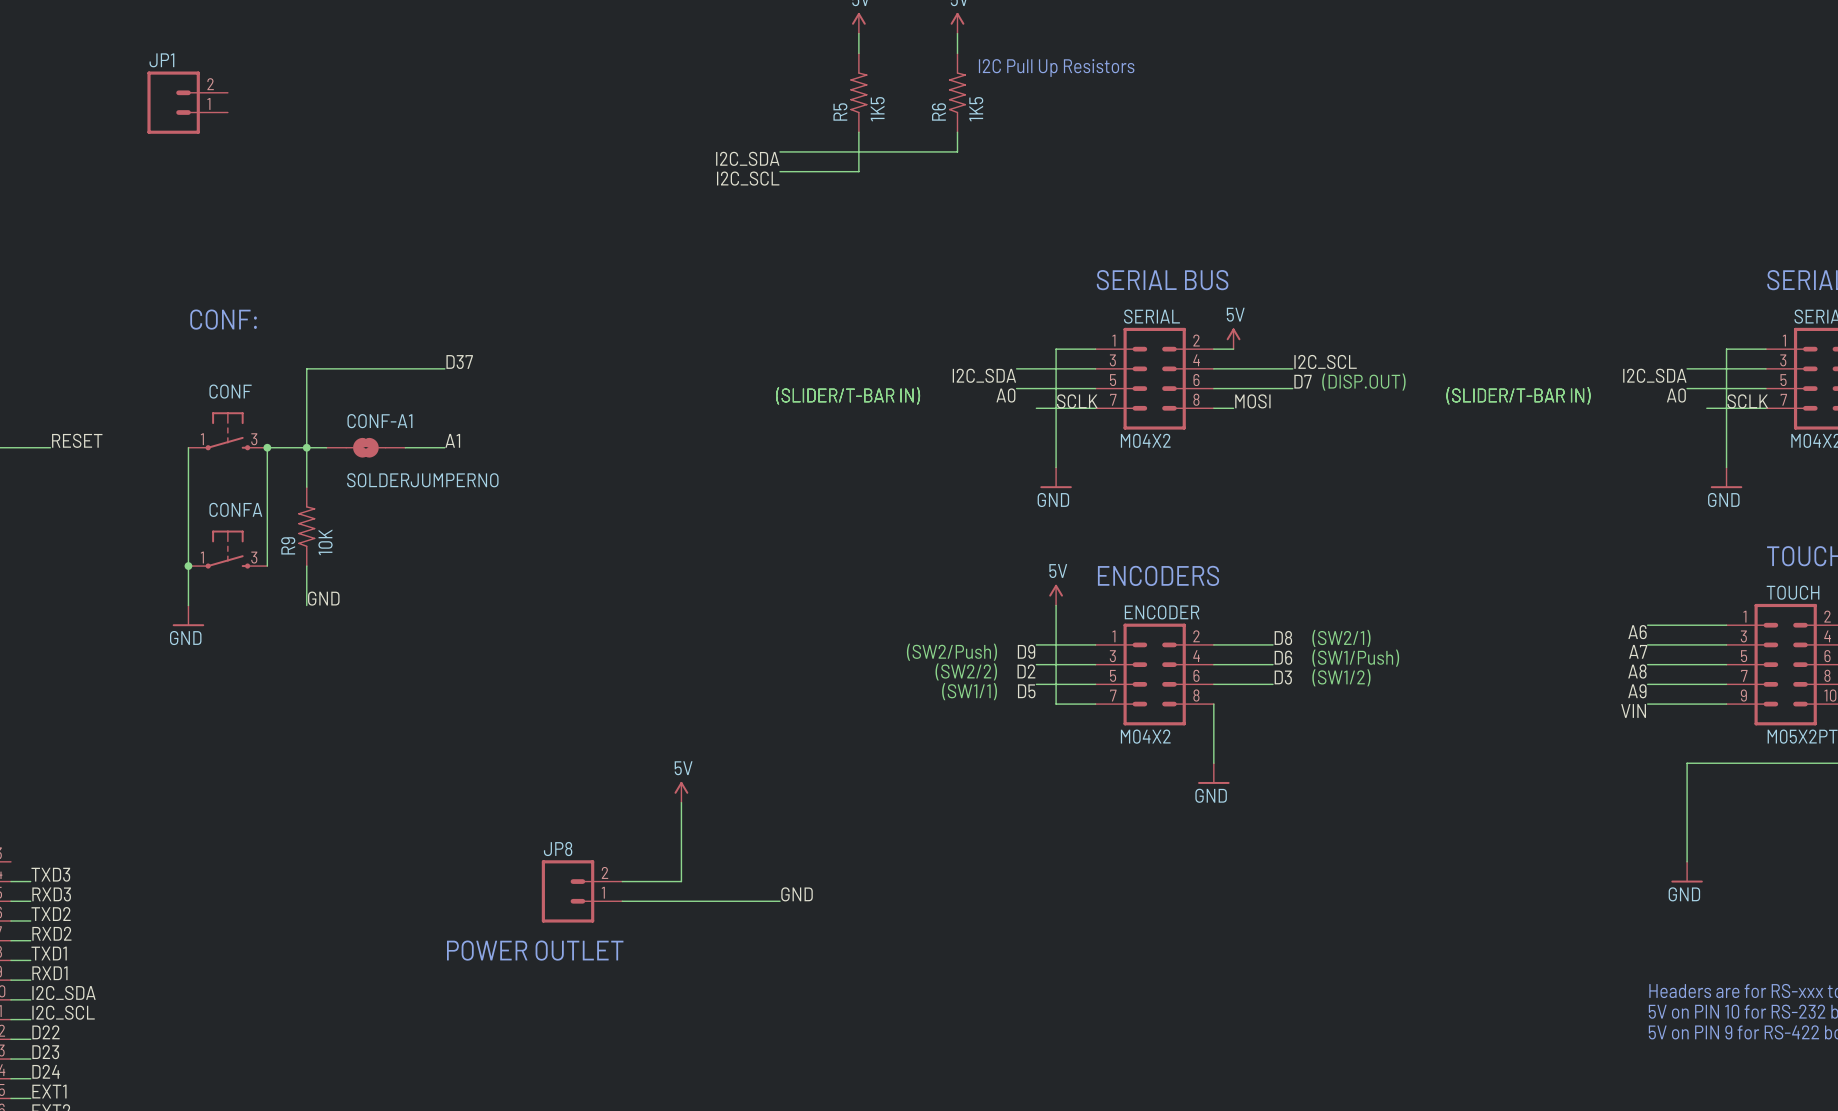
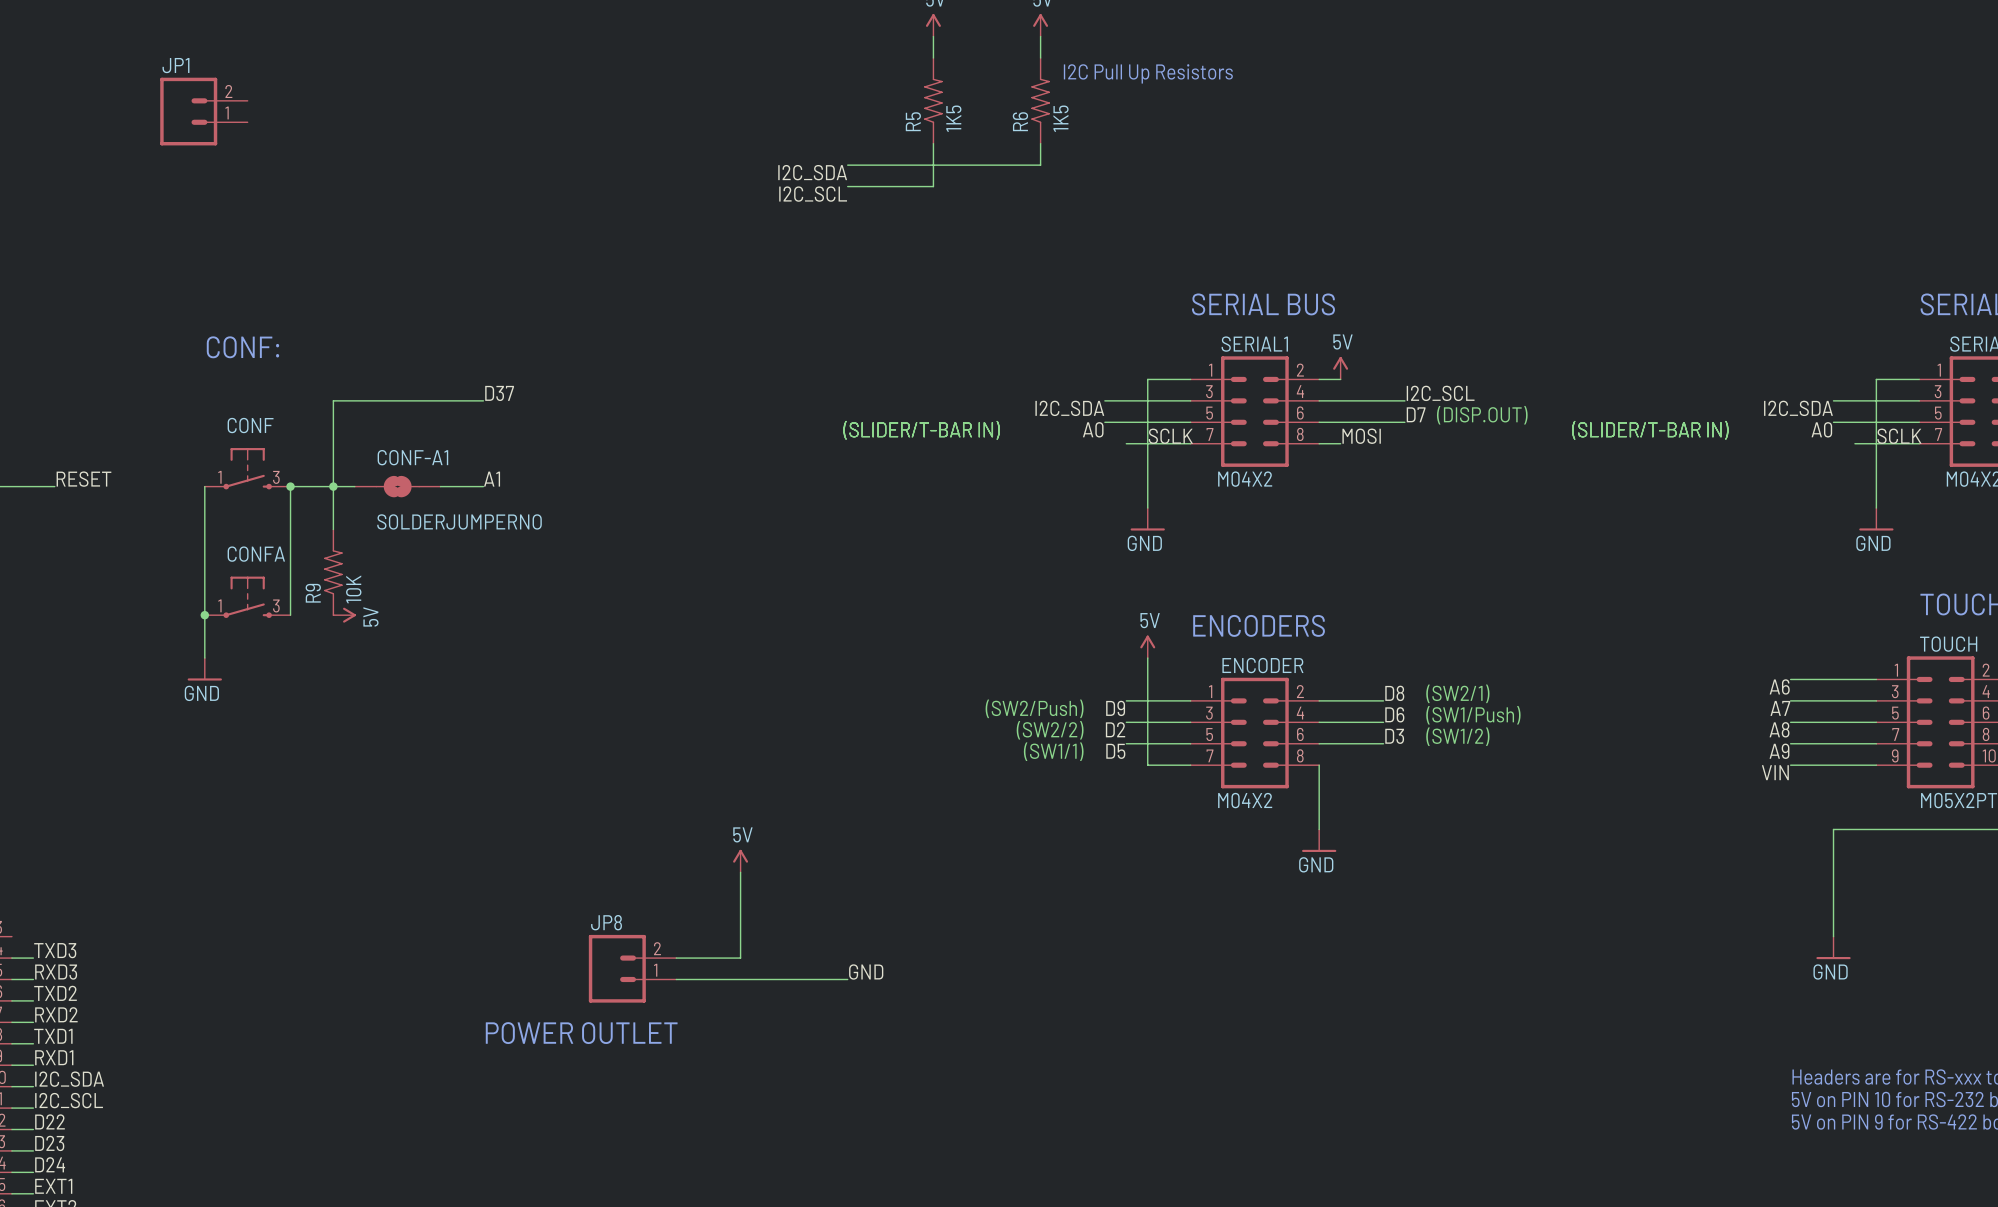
SERIAL name: SERIAL (1151, 316) -> SERIAL1 (1254, 344)
wire: (306, 566) (306, 605) -> none
power symbol: none -> 5V (344, 615)
label: GND (323, 598) -> none

